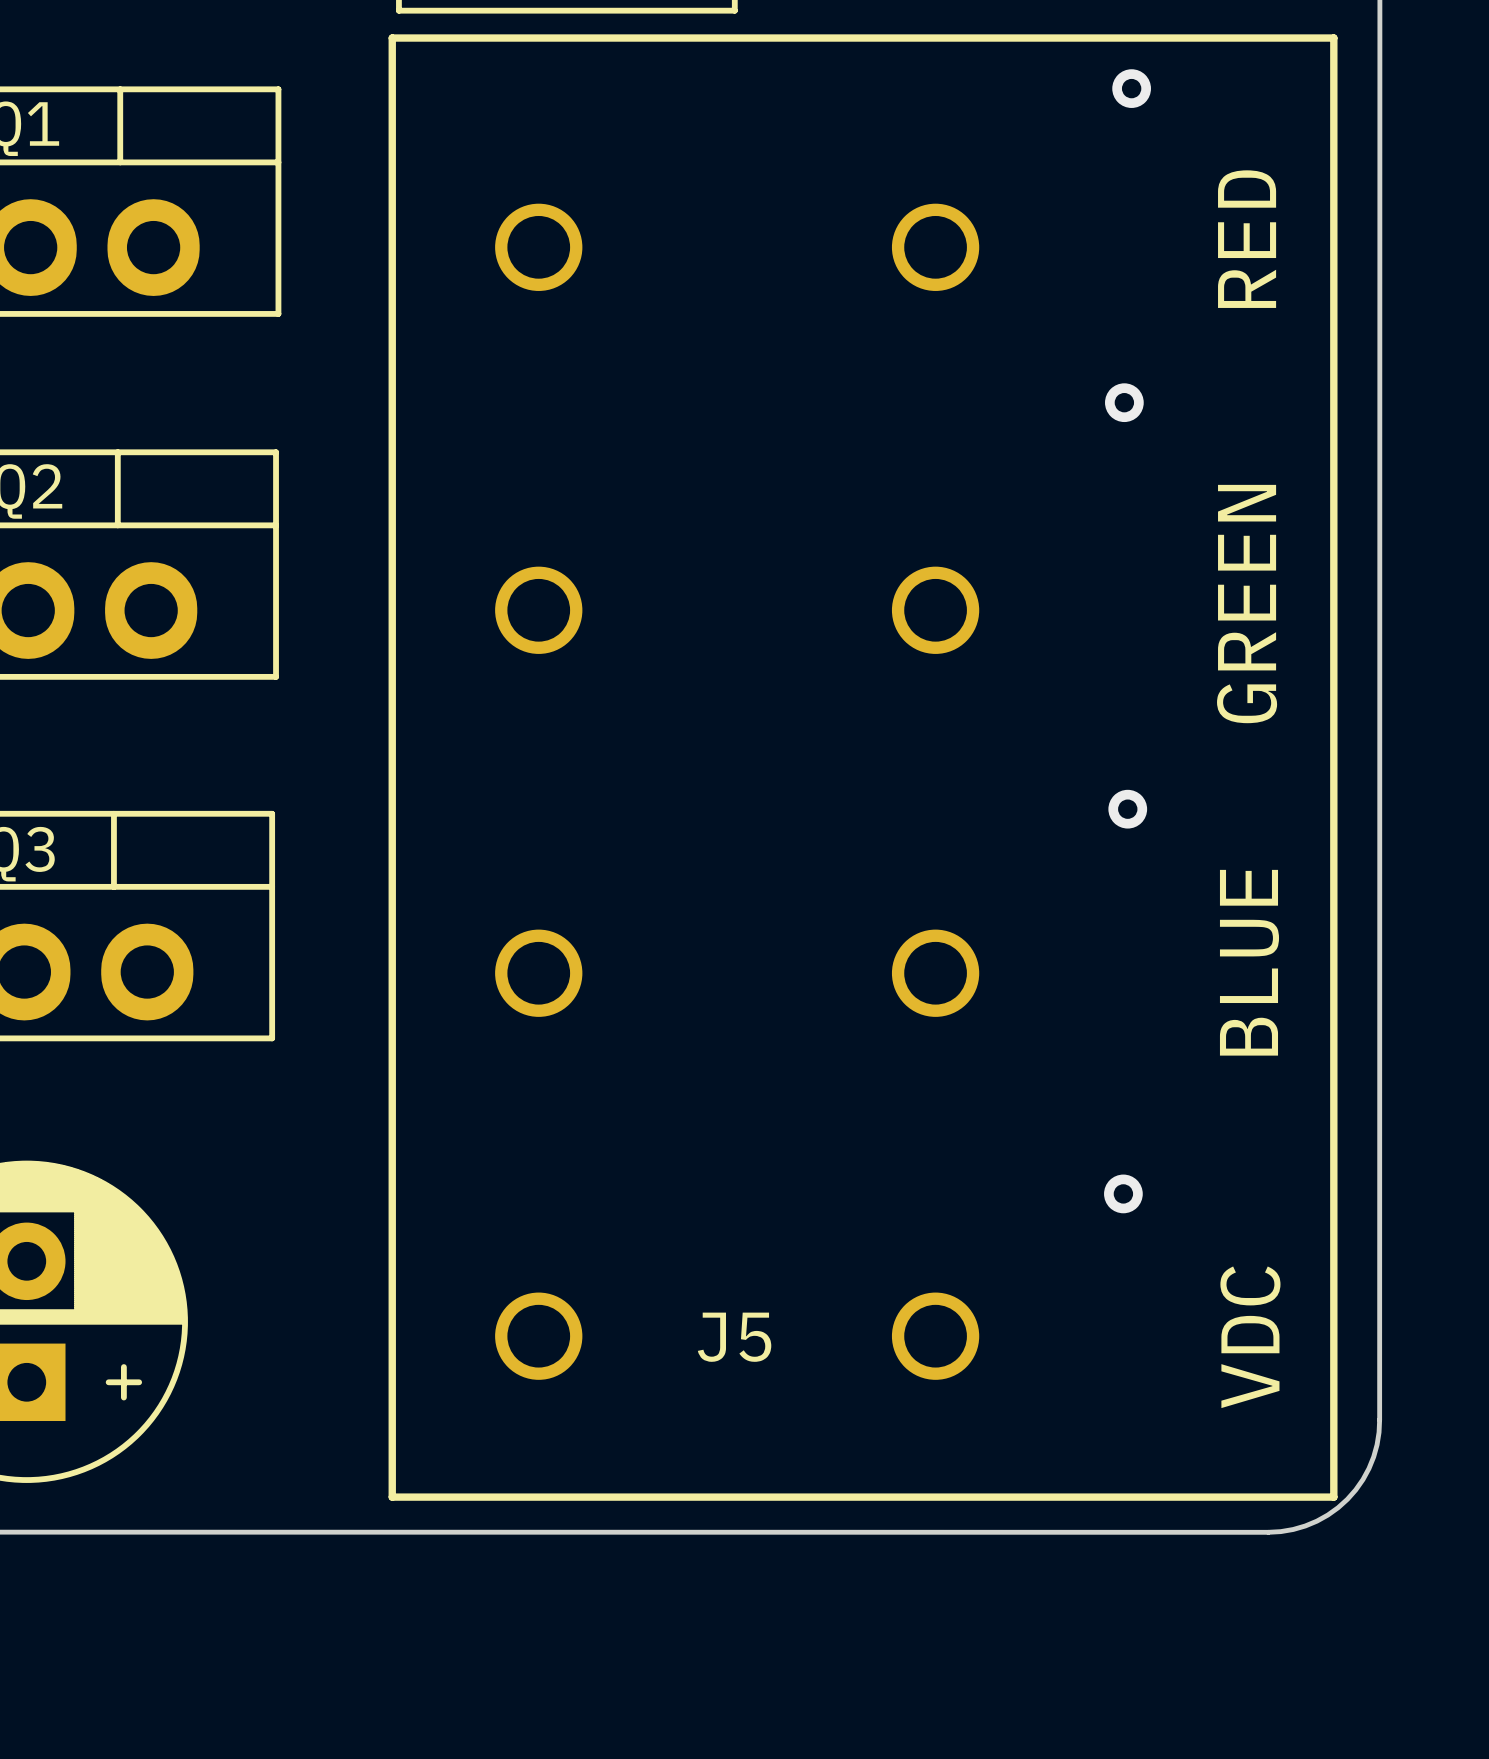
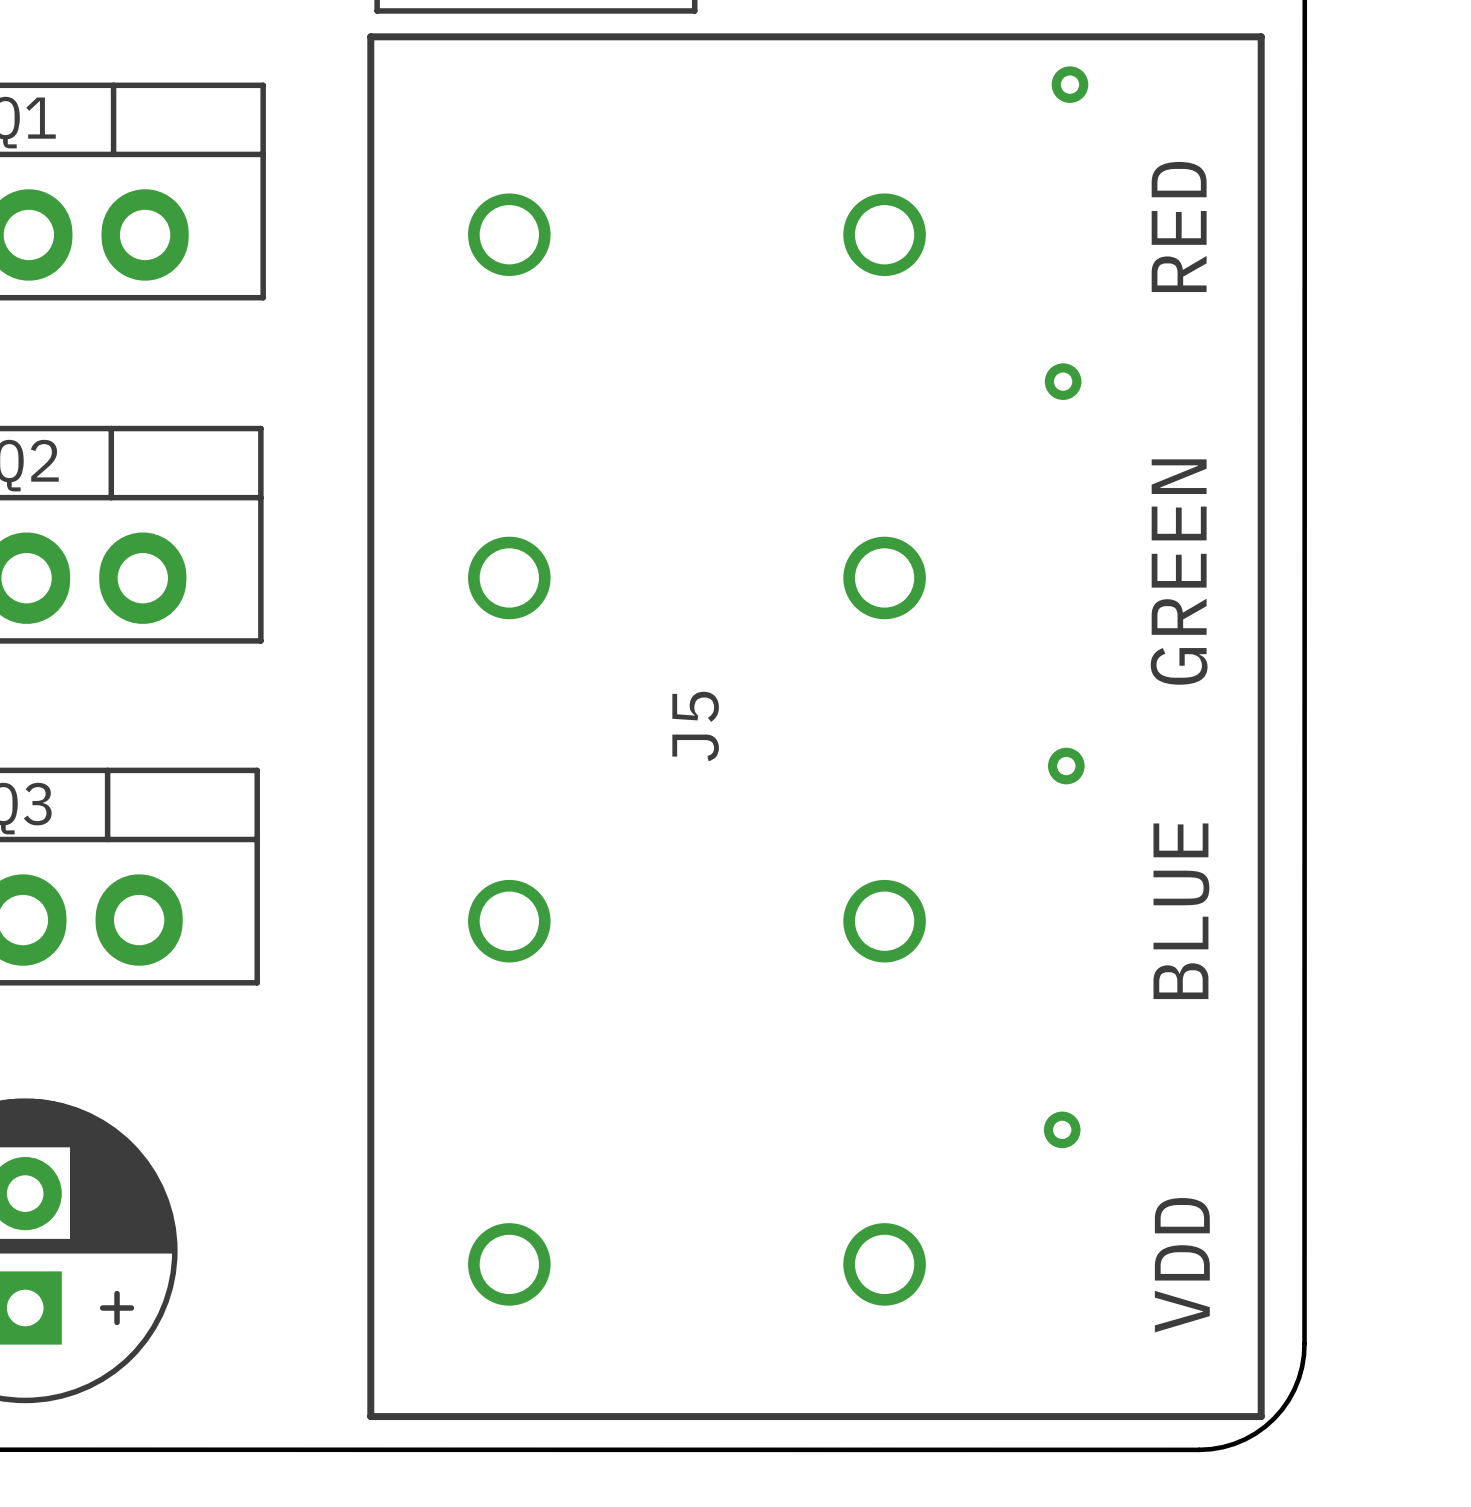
J5 name rotation: 0° (734, 1337) -> 90° counterclockwise (695, 726)
J5 name position: J5 (734, 1337) -> J5 (695, 726)
text: VDC (1250, 1337) -> VDD (1182, 1265)

